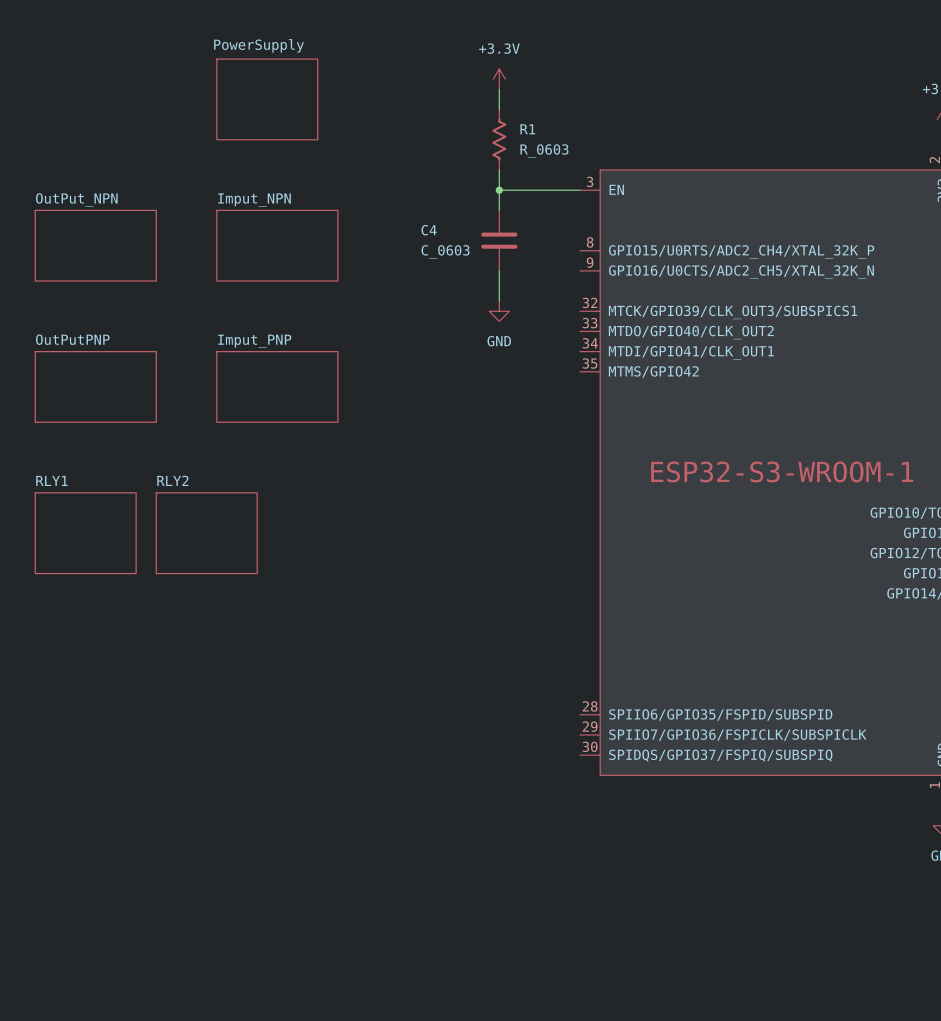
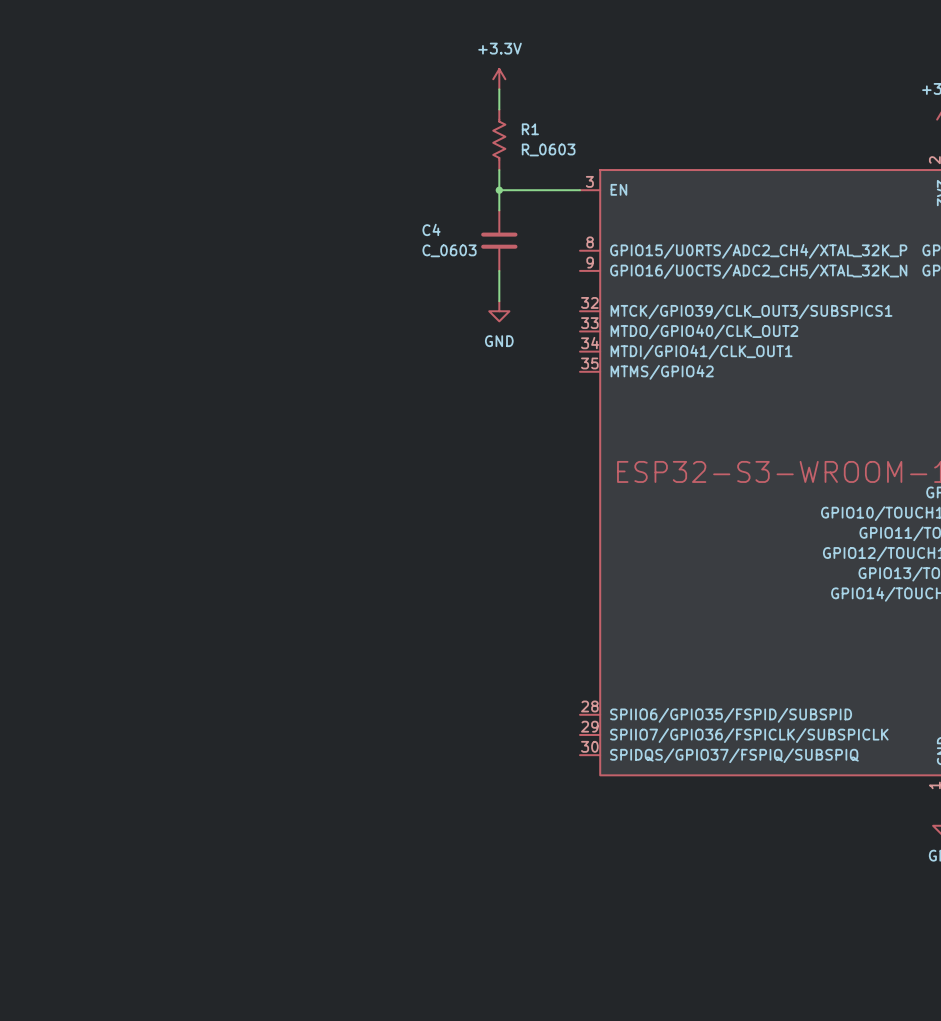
sheet PowerSupply: (267, 99) -> none
sheet OutPut_NPN: (95, 245) -> none
sheet Imput_NPN: (277, 245) -> none
sheet OutPutPNP: (95, 386) -> none
sheet Imput_PNP: (277, 386) -> none
sheet RLY1: (85, 533) -> none
sheet RLY2: (206, 533) -> none

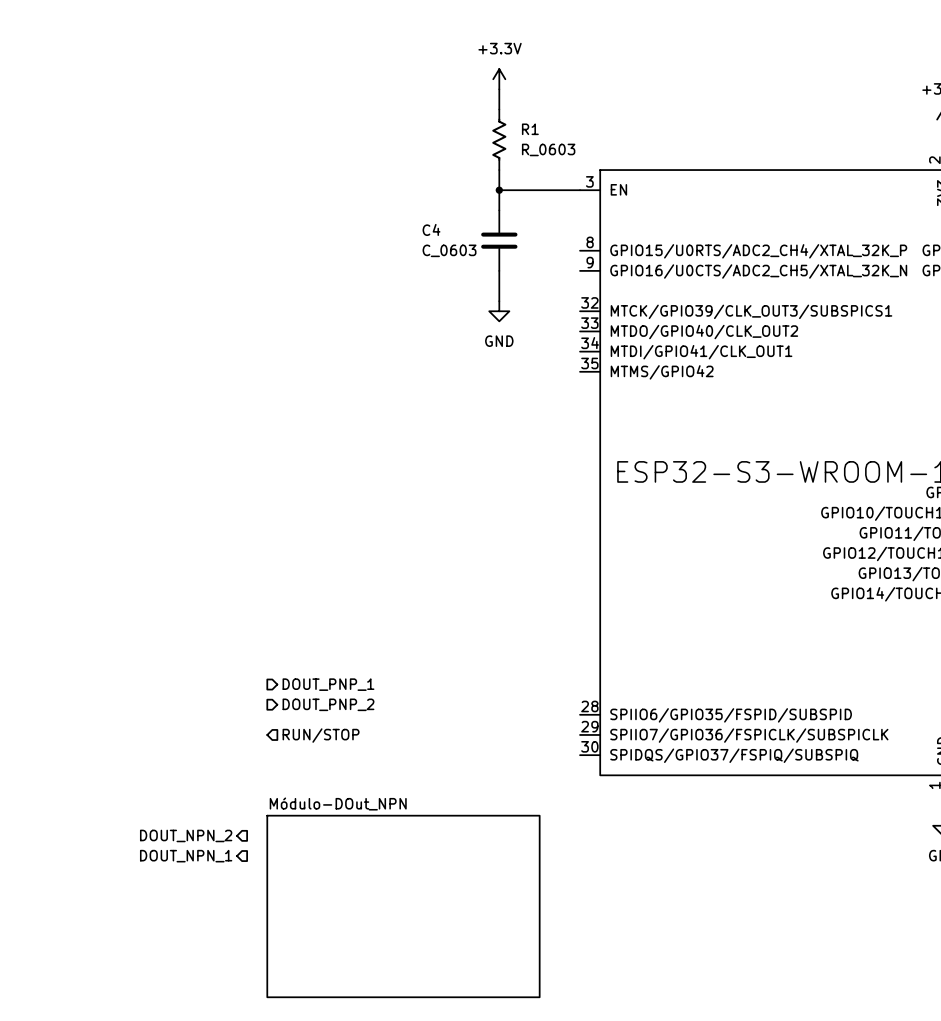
hierarchical label: none -> DOUT_PNP_1 (328, 684)
hierarchical label: none -> DOUT_PNP_2 (328, 704)
hierarchical label: none -> RUN/STOP (321, 735)
hierarchical label: none -> DOUT_NPN_2 (186, 835)
hierarchical label: none -> DOUT_NPN_1 (186, 856)
sheet Módulo-DOut_NPN: none -> (403, 906)

